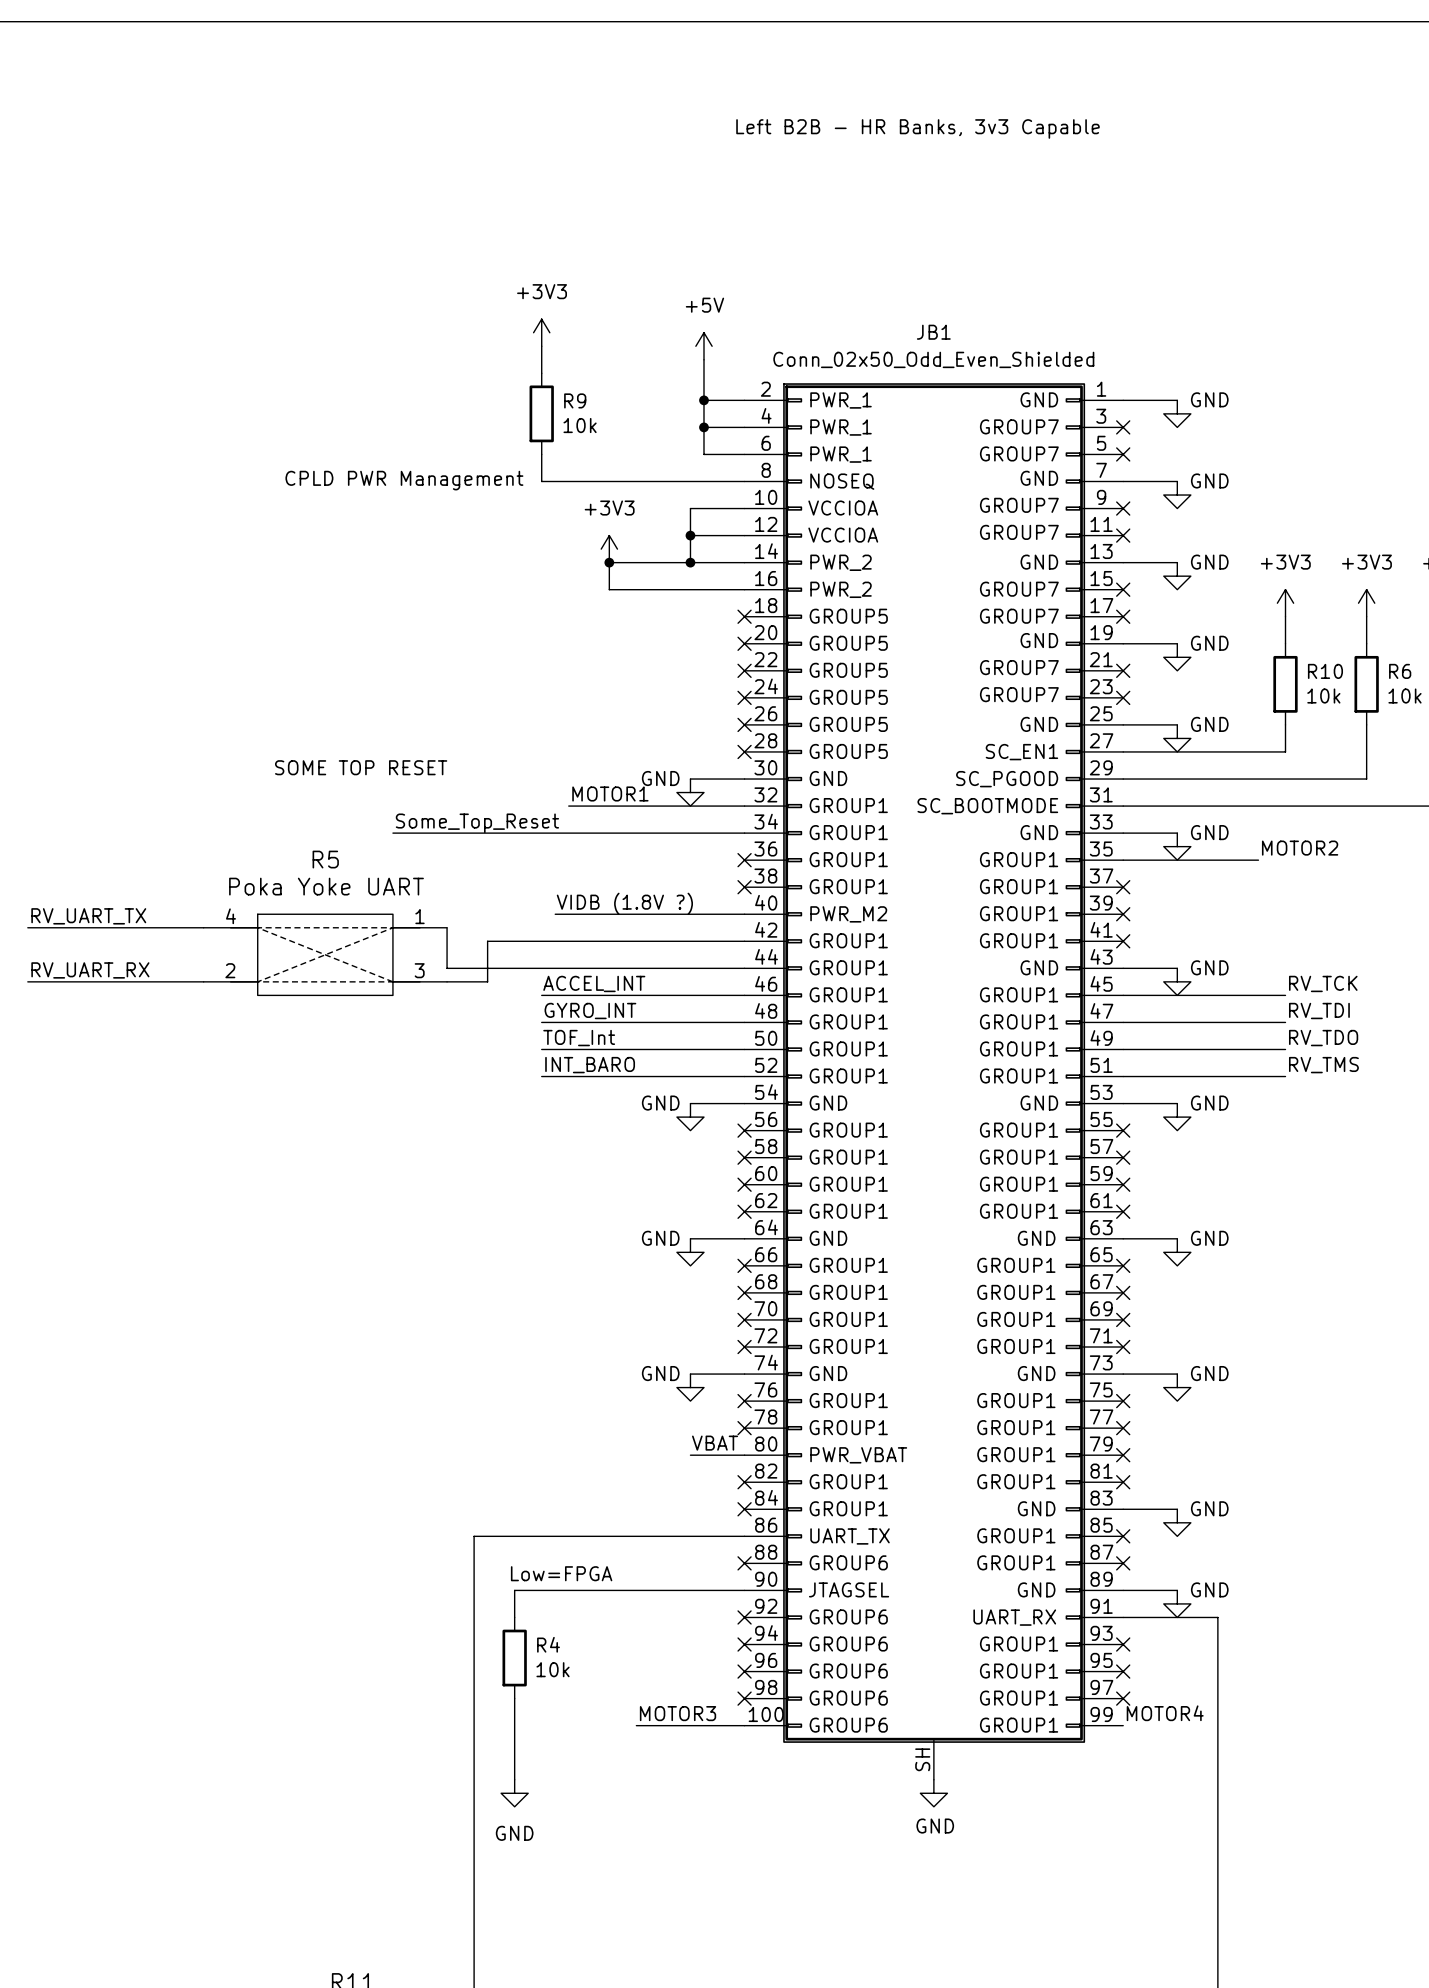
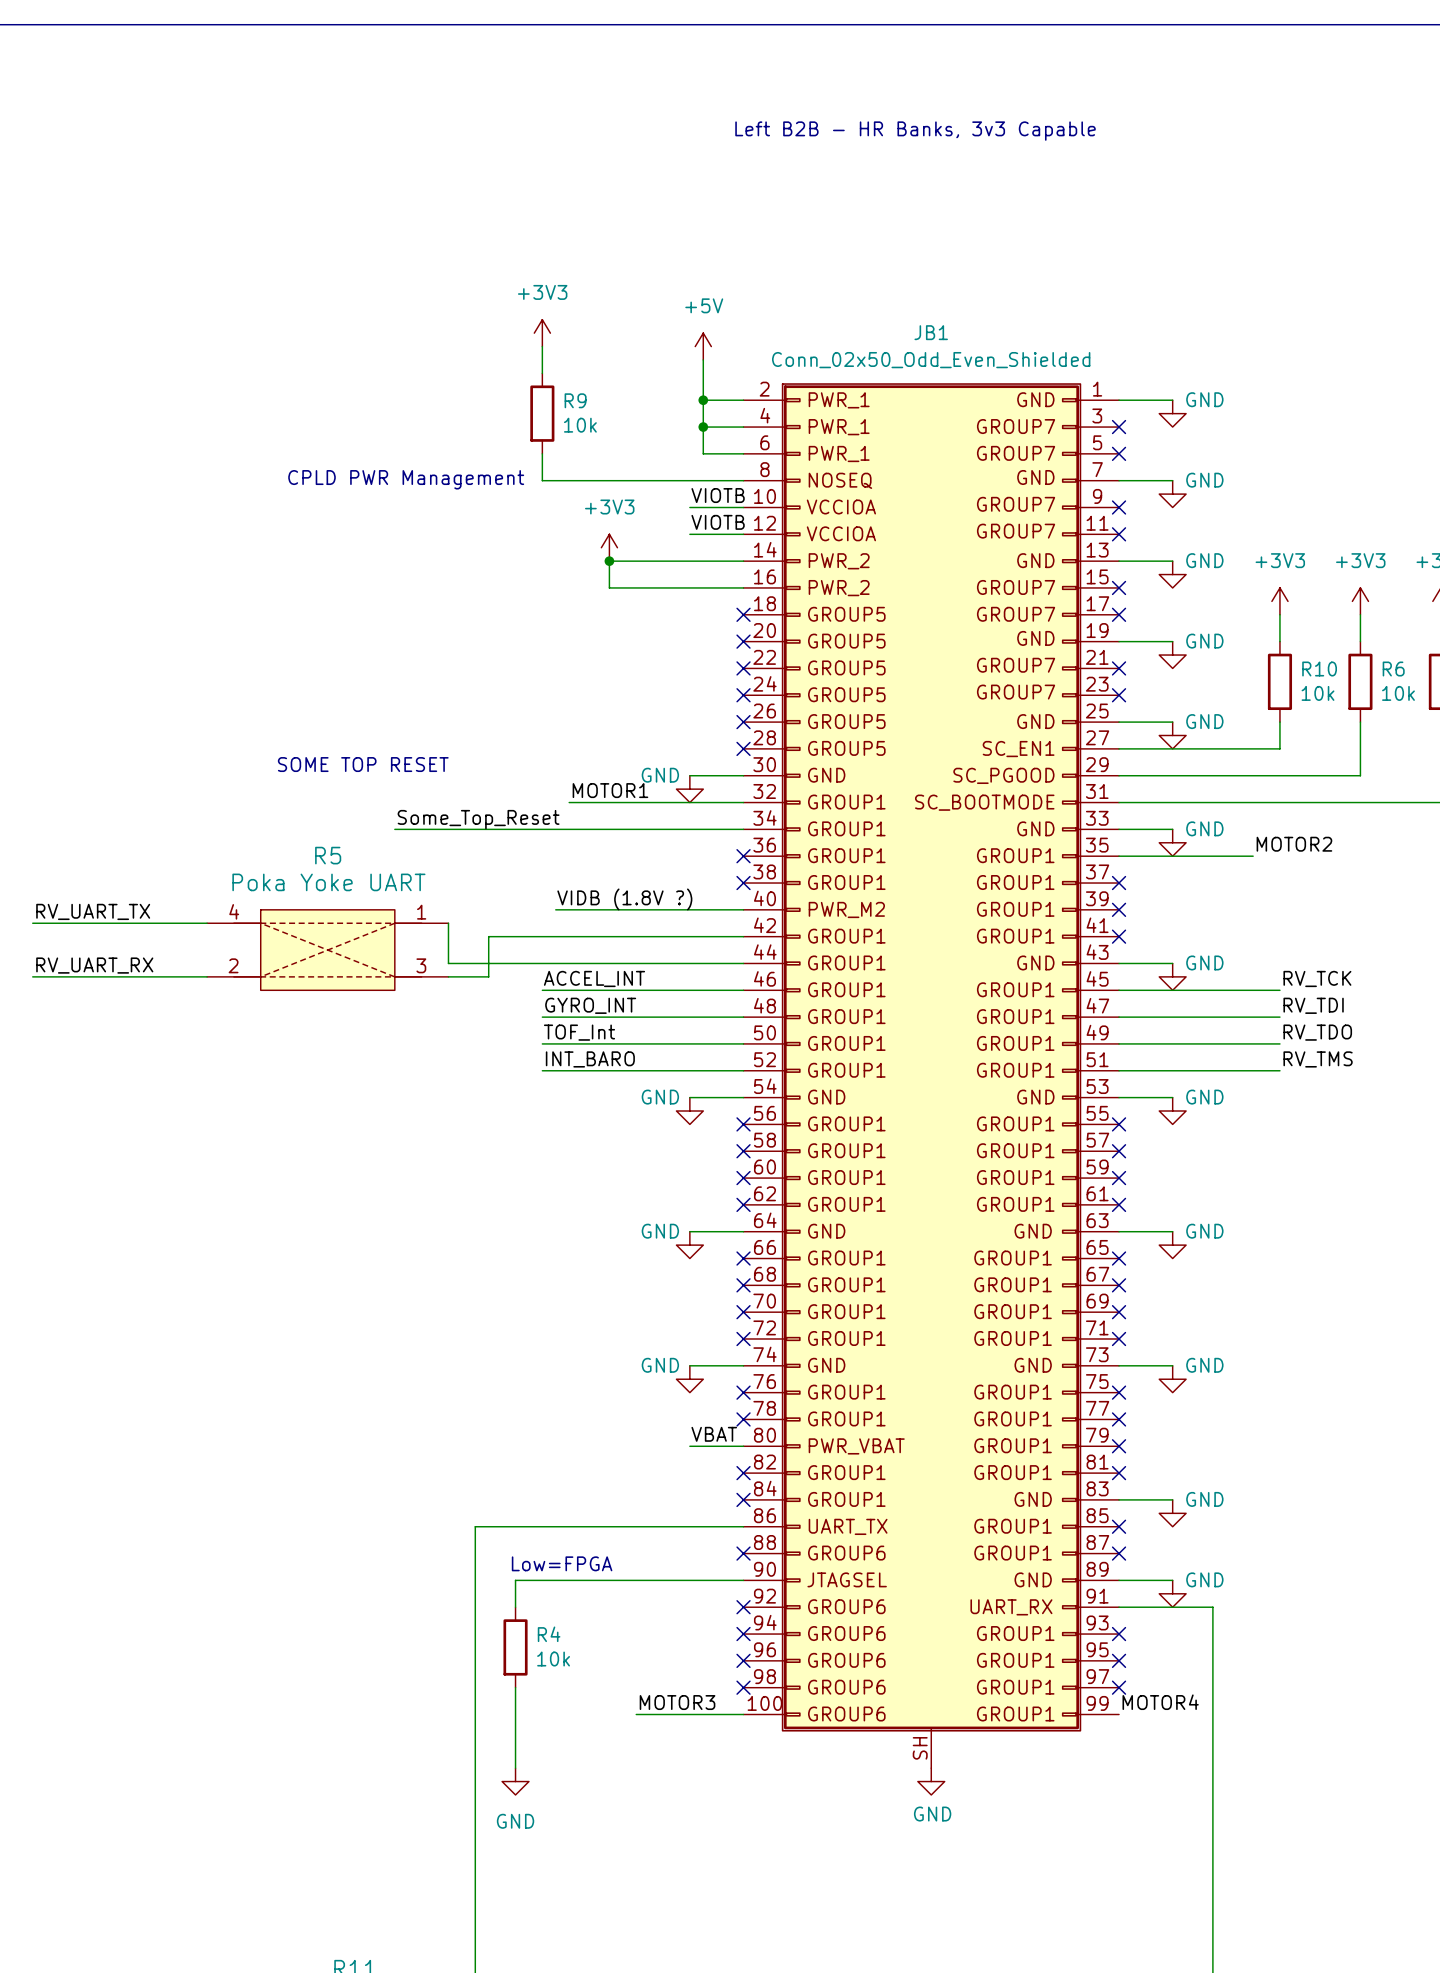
label: none -> VIOTB (718, 495)
wire: (690, 508) (690, 562) -> none
label: none -> VIOTB (718, 522)
junction: (690, 535) -> none
junction: (690, 562) -> none

